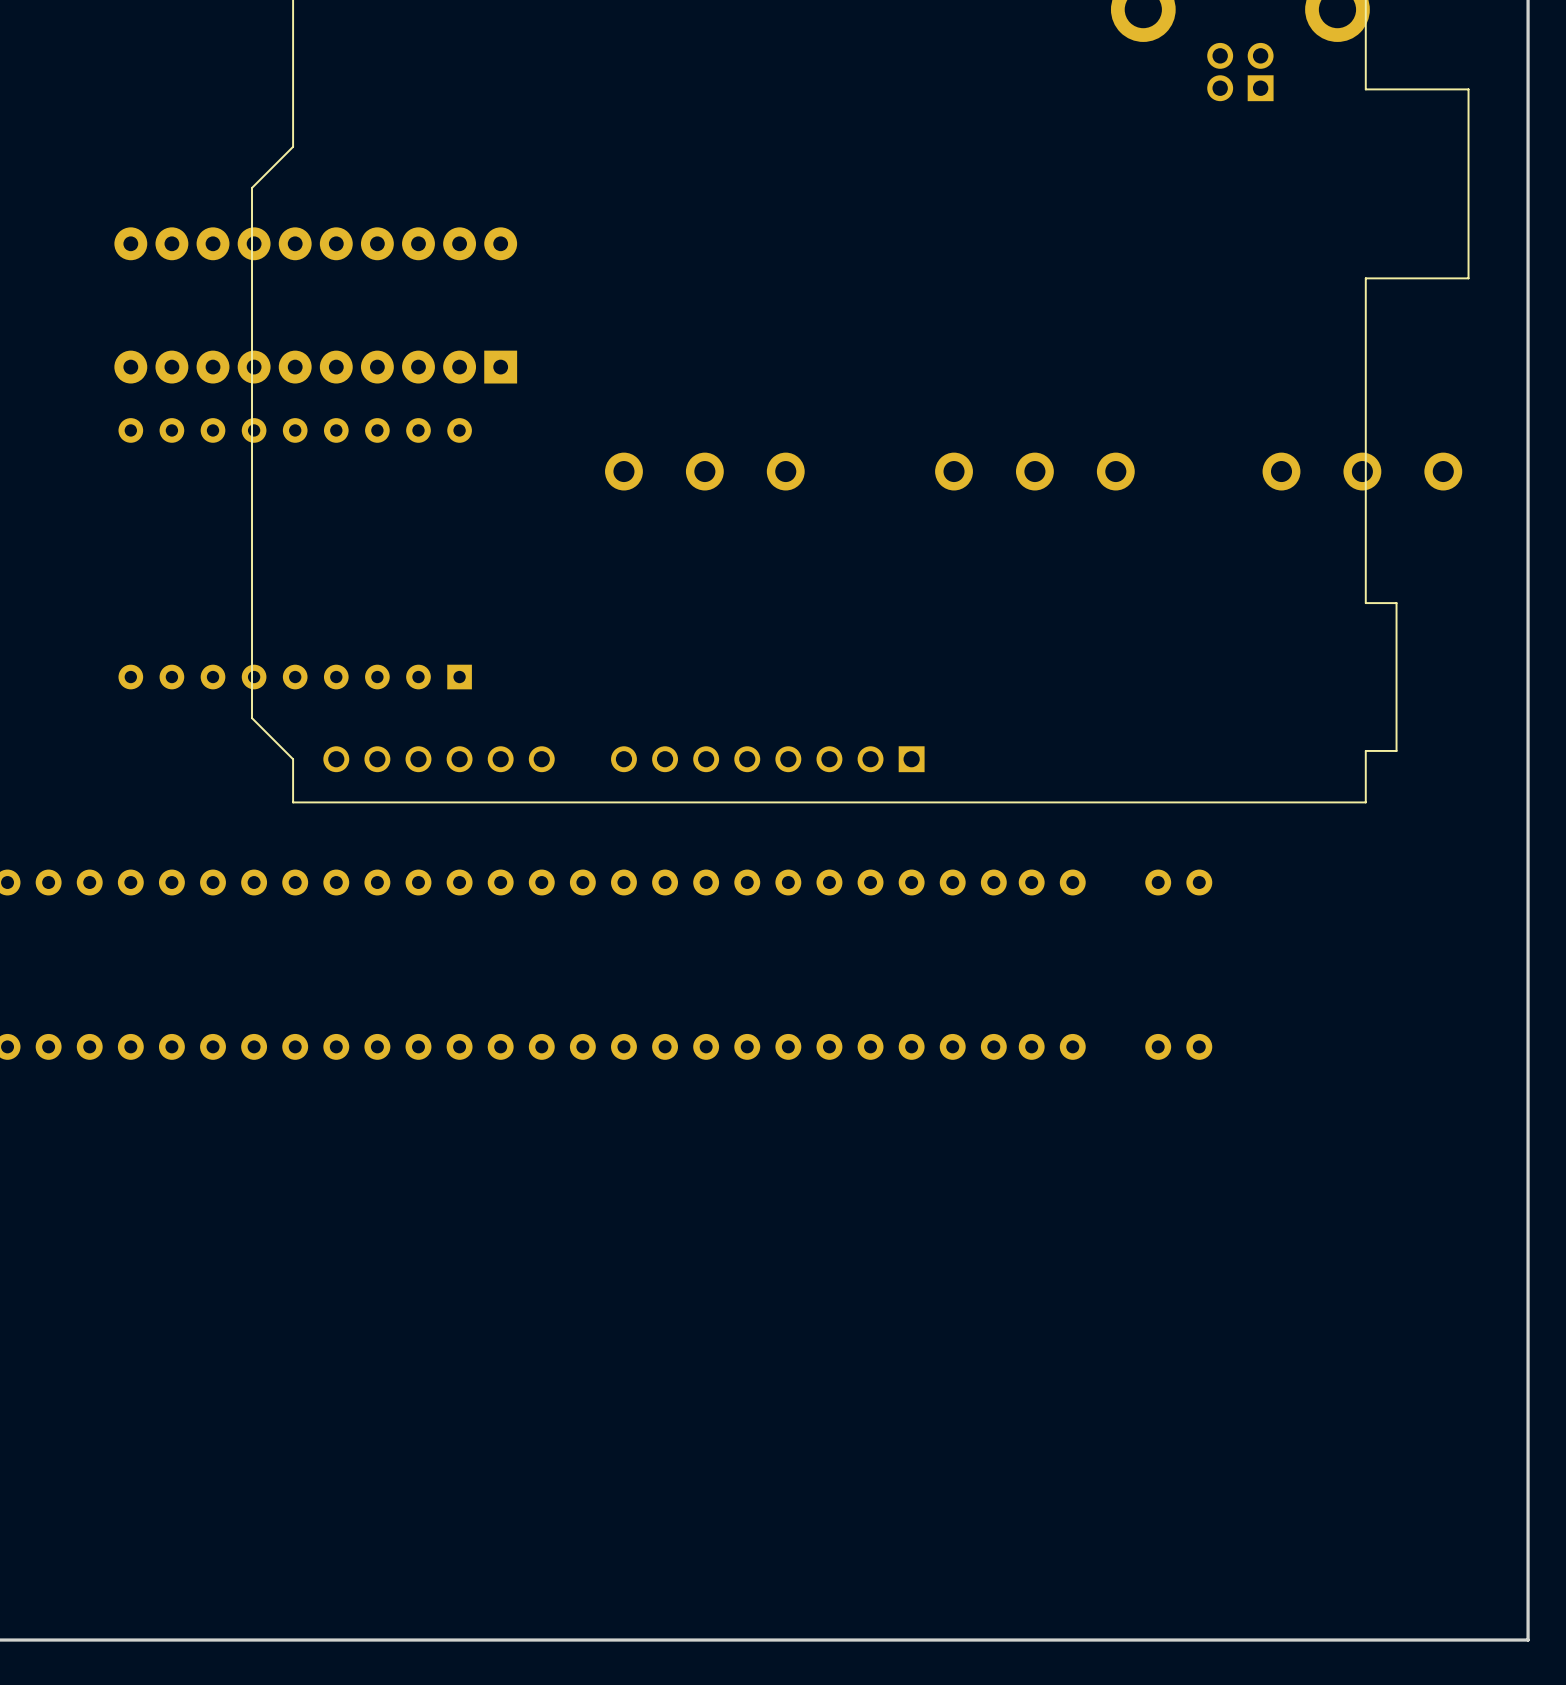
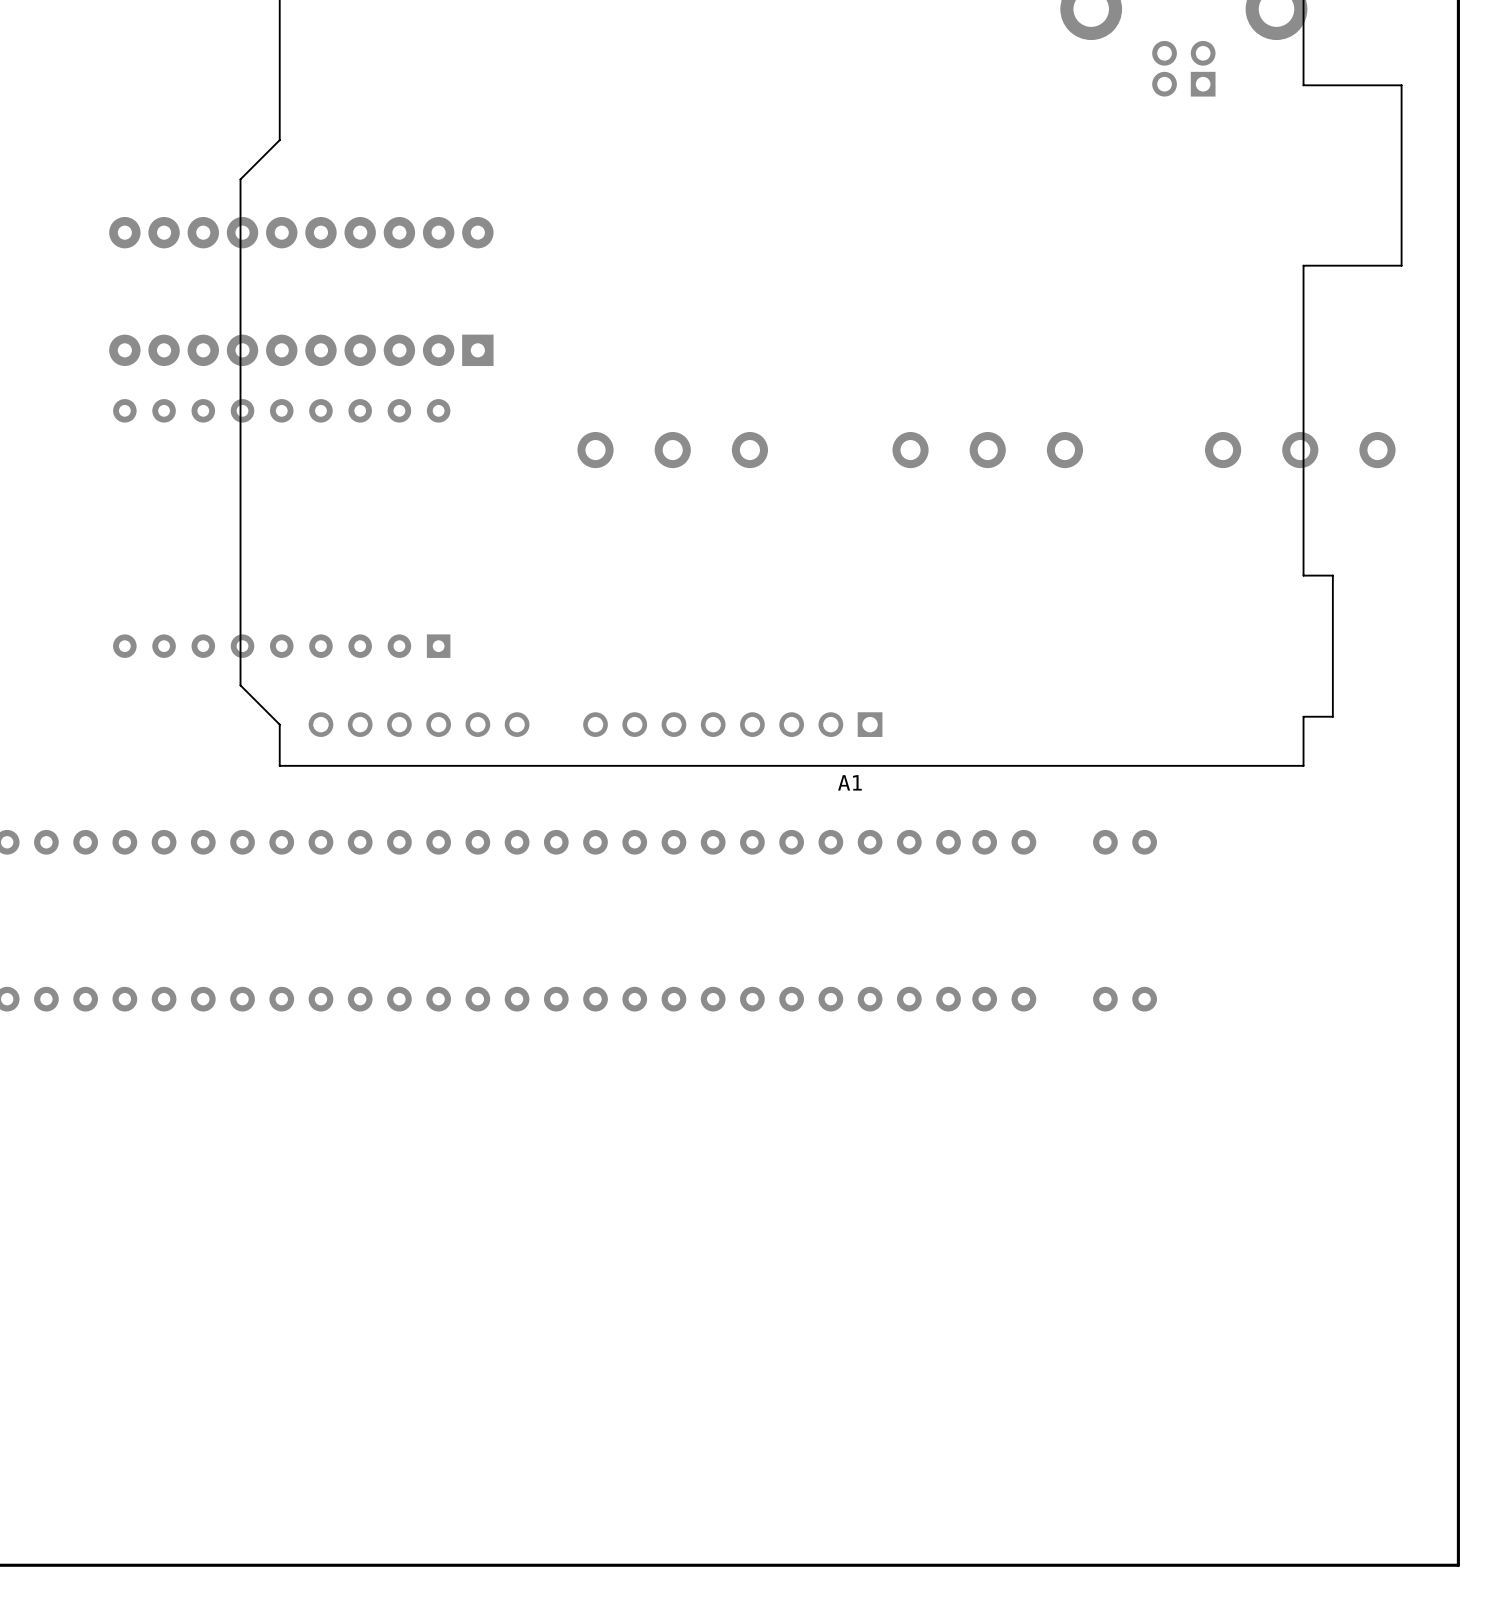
A1 name: none -> A1 (849, 782)

